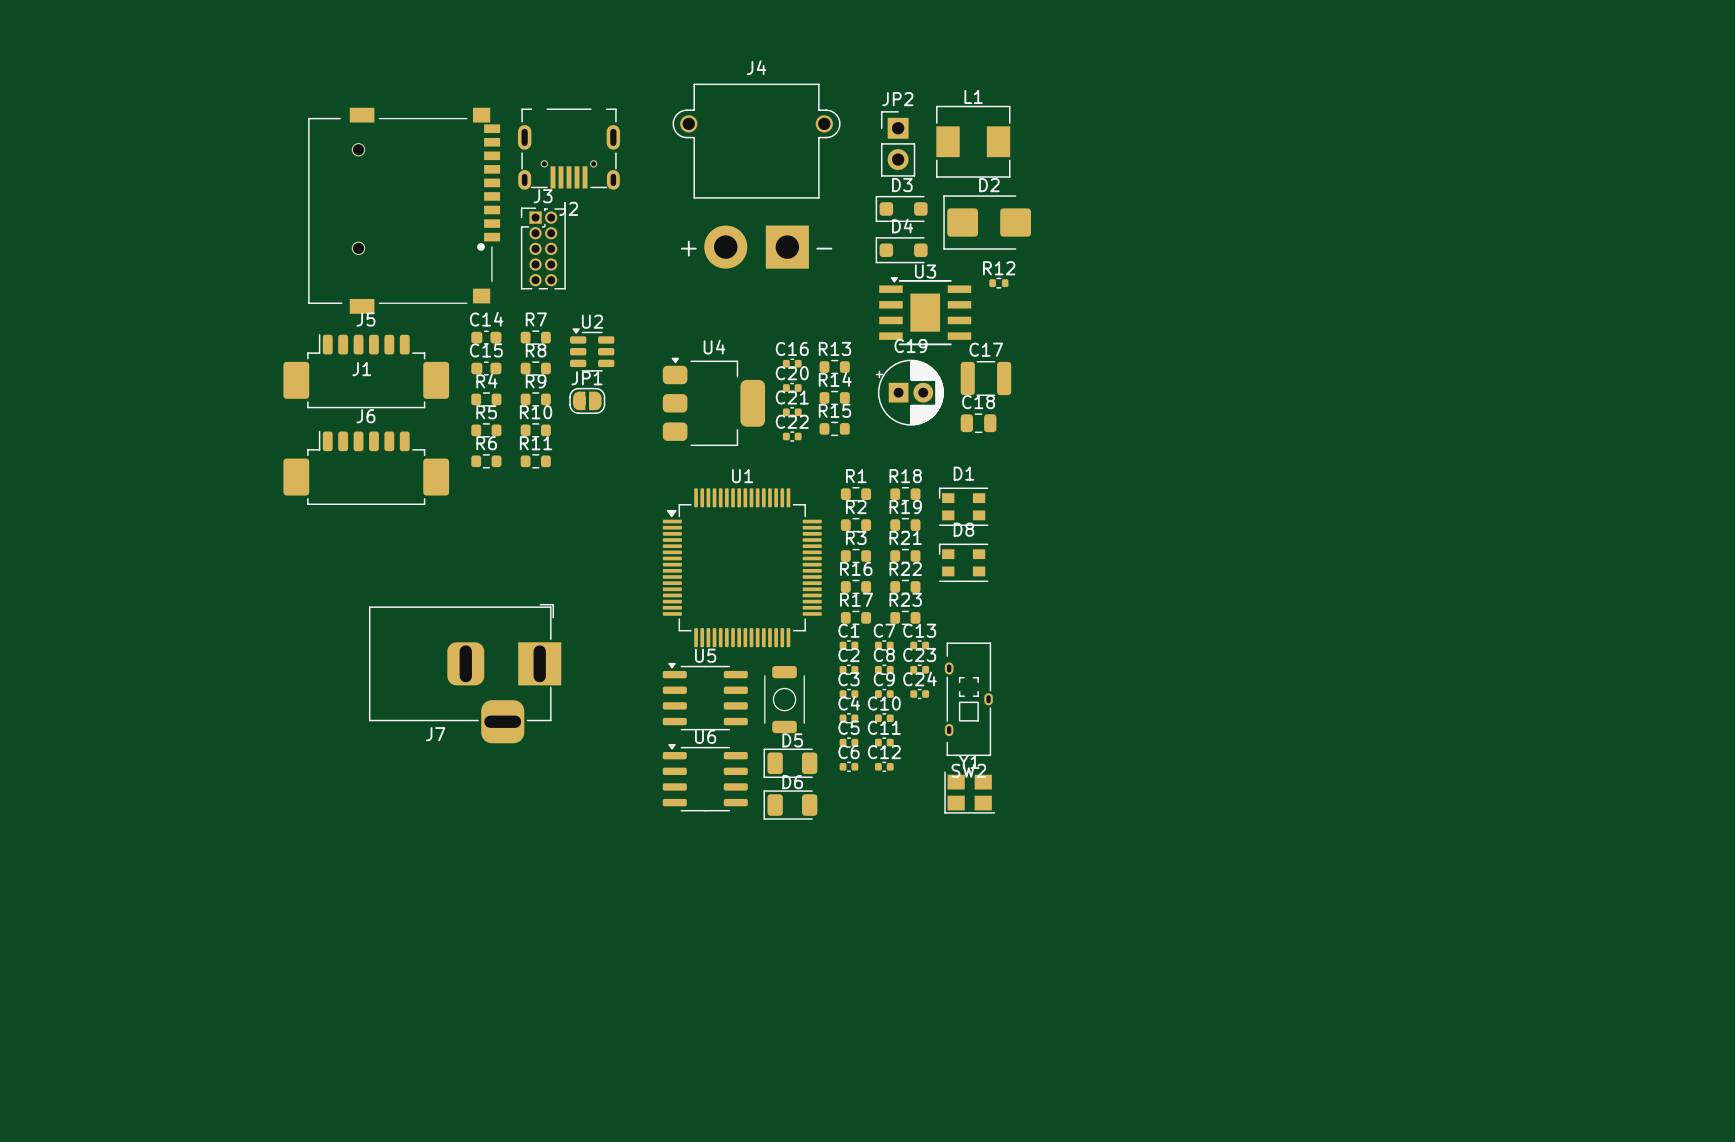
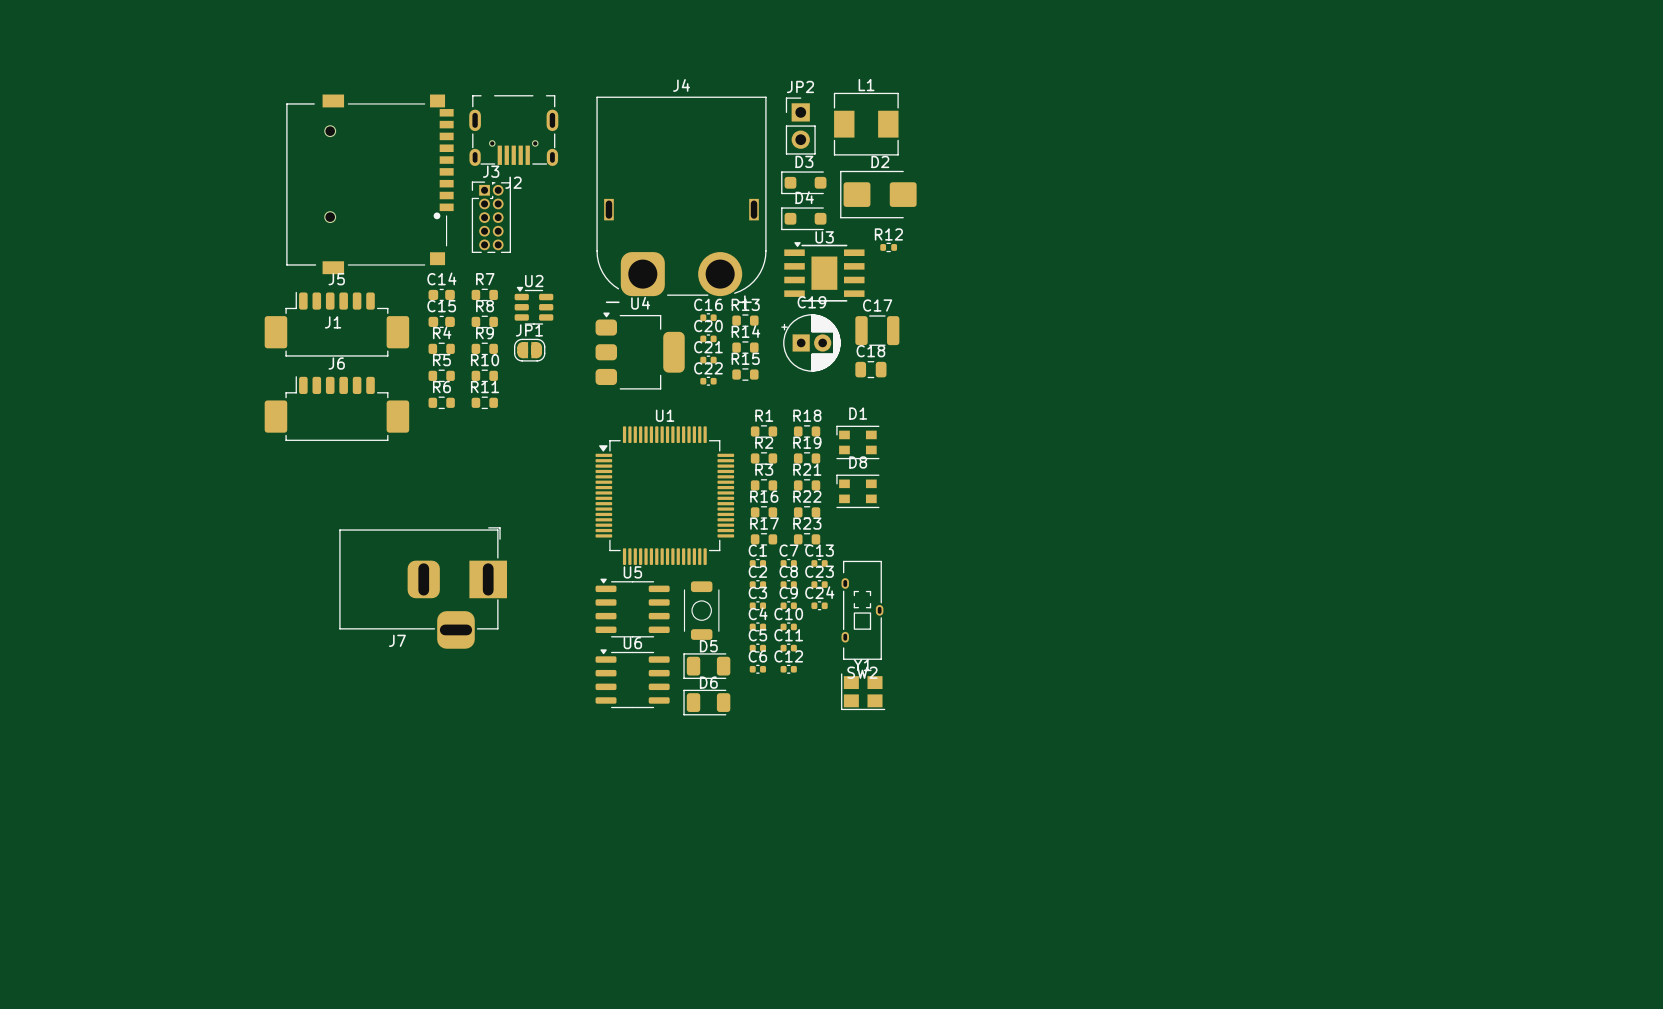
J4 footprint: [672, 83, 841, 269] -> [596, 96, 767, 297]

